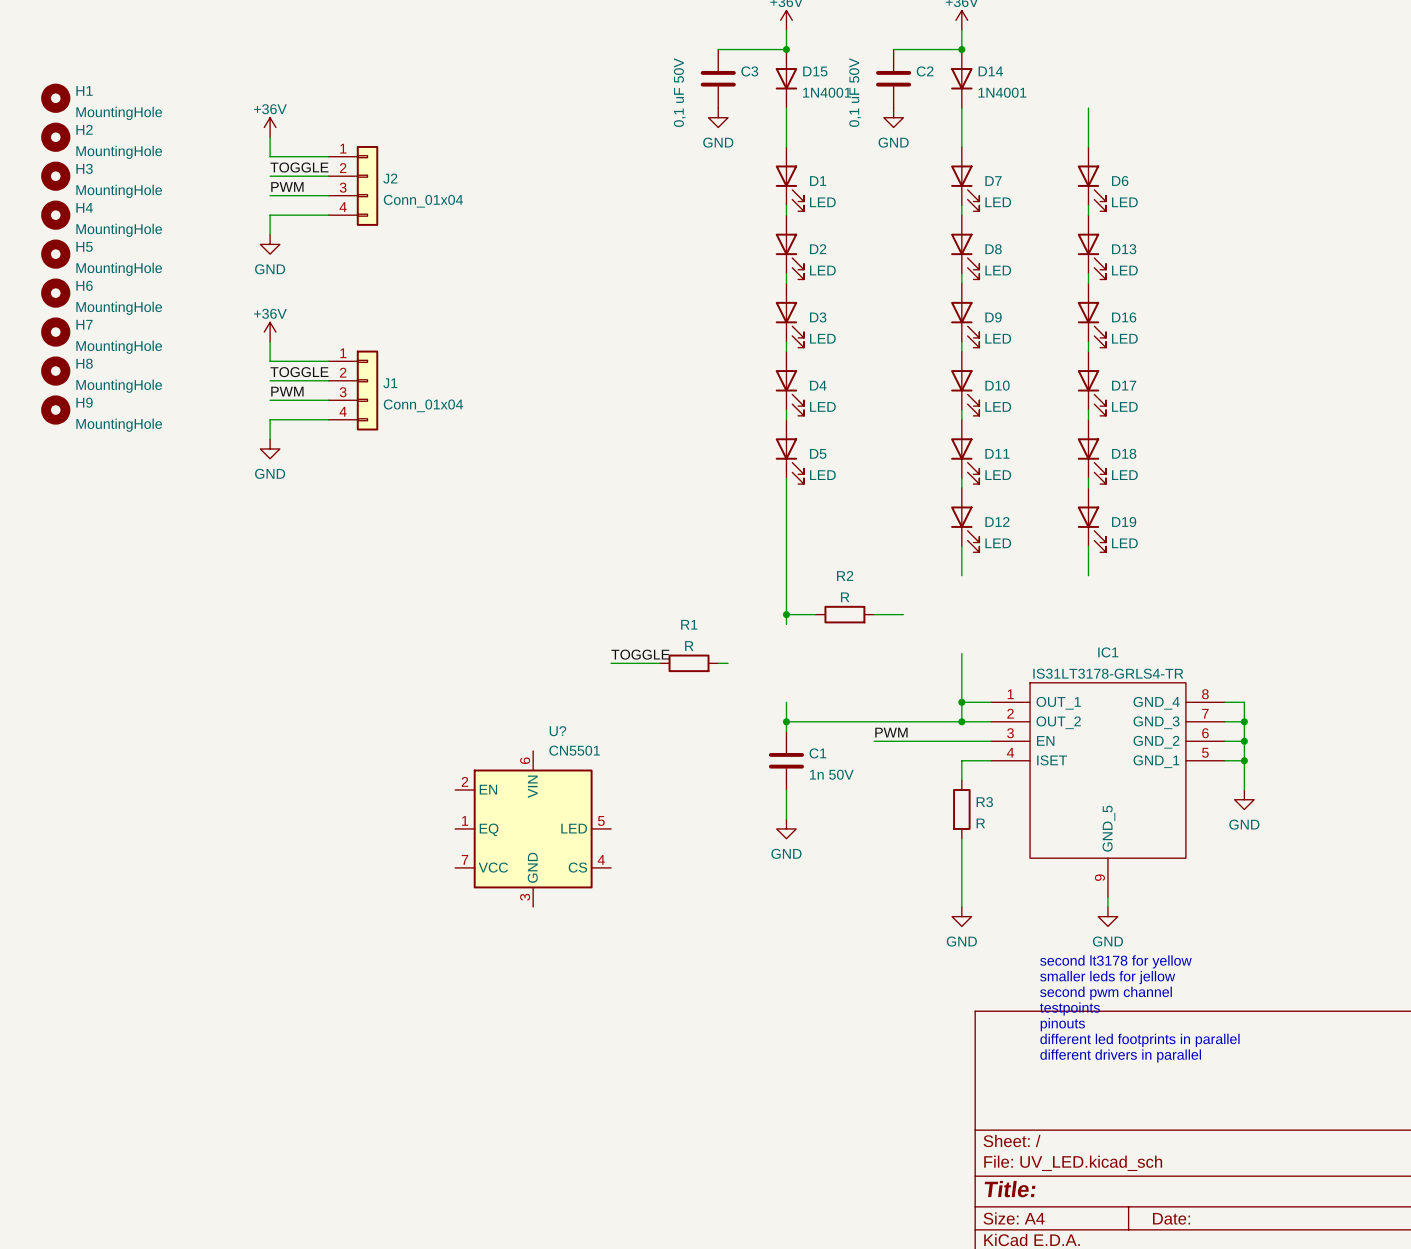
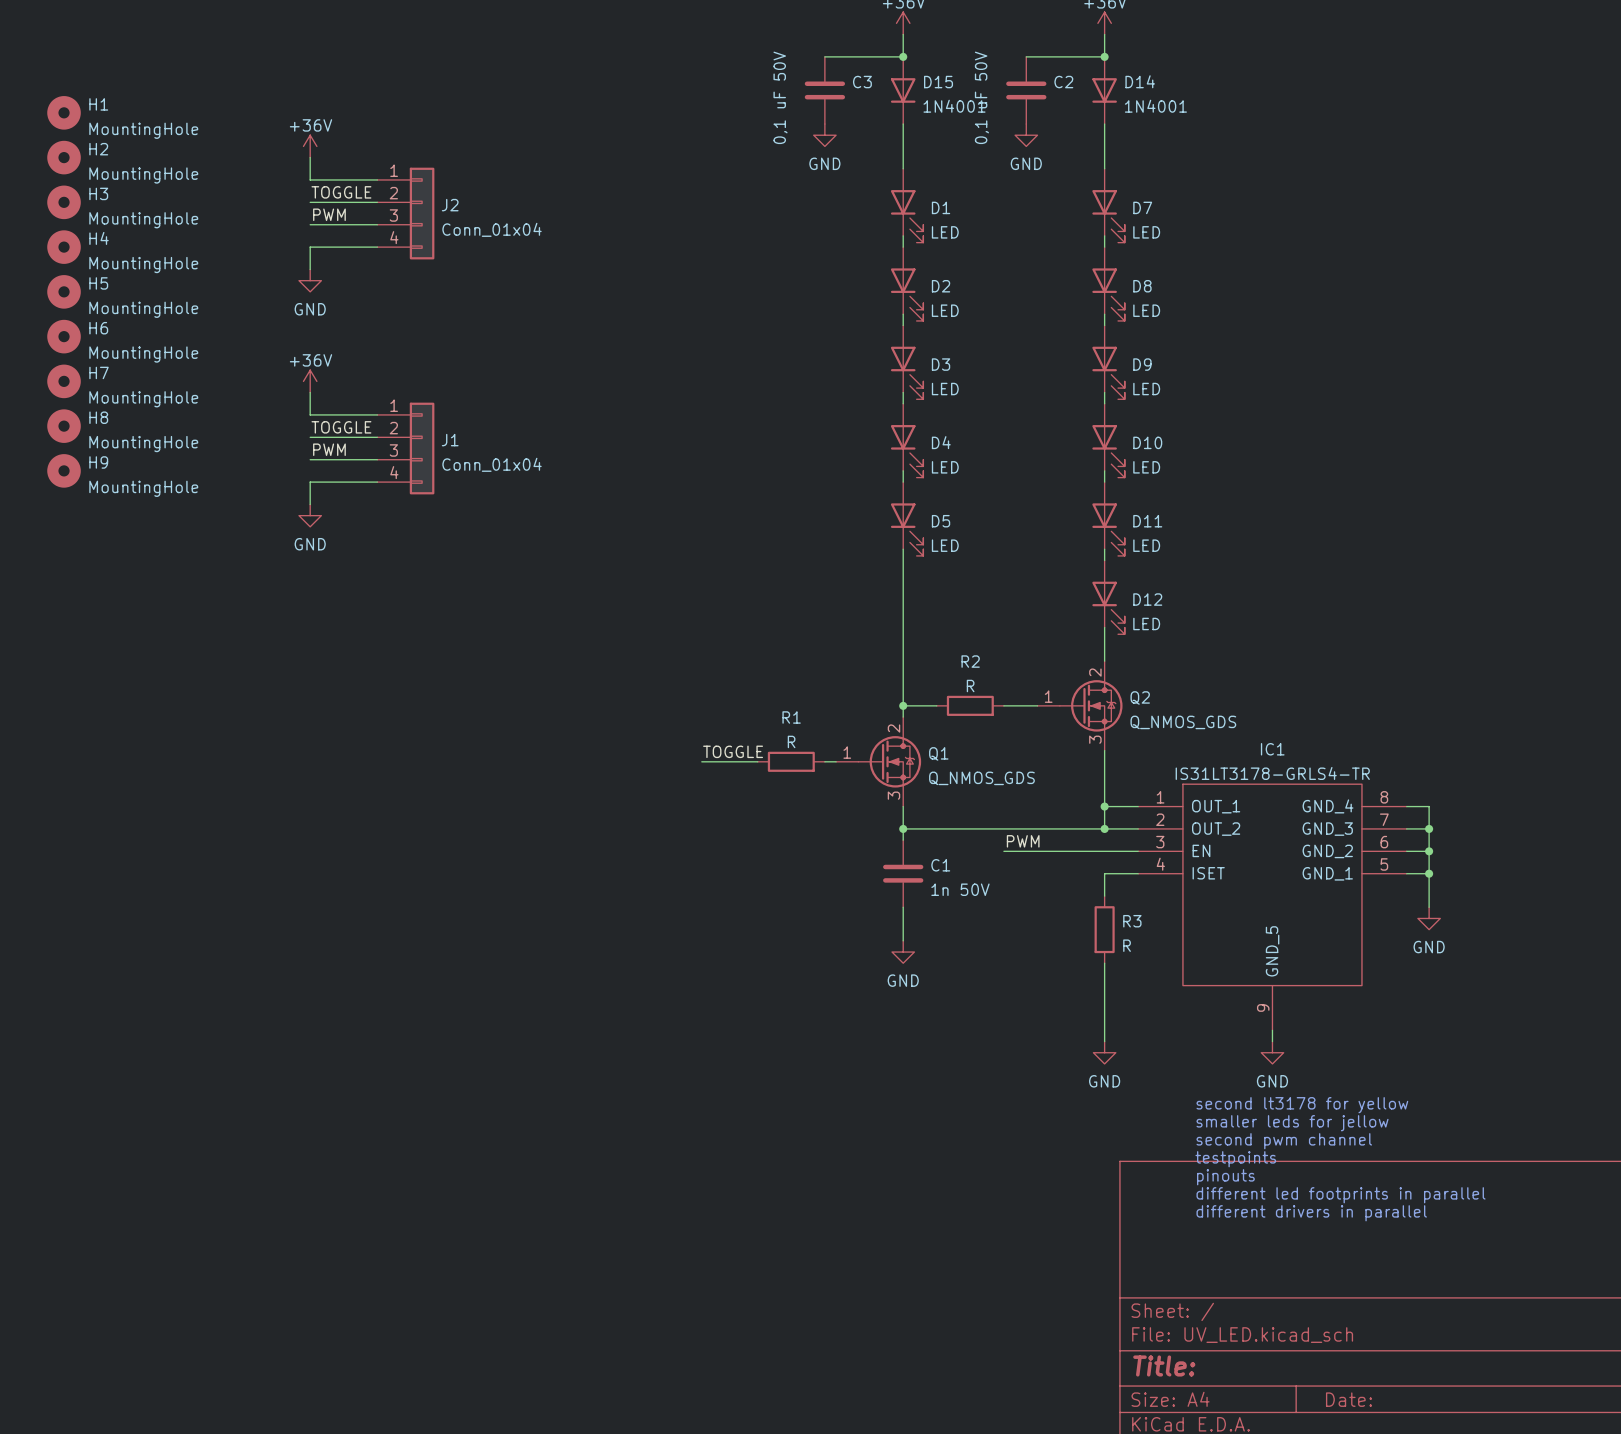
wire: (1088, 107) (1088, 146) -> none
D6: LED (1091, 179) -> none
wire: (1088, 205) (1088, 215) -> none
D13: LED (1091, 247) -> none
wire: (1088, 273) (1088, 283) -> none
D16: LED (1091, 315) -> none
wire: (1088, 341) (1088, 351) -> none
D17: LED (1091, 383) -> none
wire: (1088, 410) (1088, 419) -> none
D18: LED (1091, 451) -> none
wire: (1088, 478) (1088, 487) -> none
D19: LED (1091, 520) -> none
wire: (1088, 546) (1088, 575) -> none
Q2: none -> Q_NMOS_GDS (1080, 705)
Q1: none -> Q_NMOS_GDS (878, 761)
U?: CN5501 (533, 828) -> none

